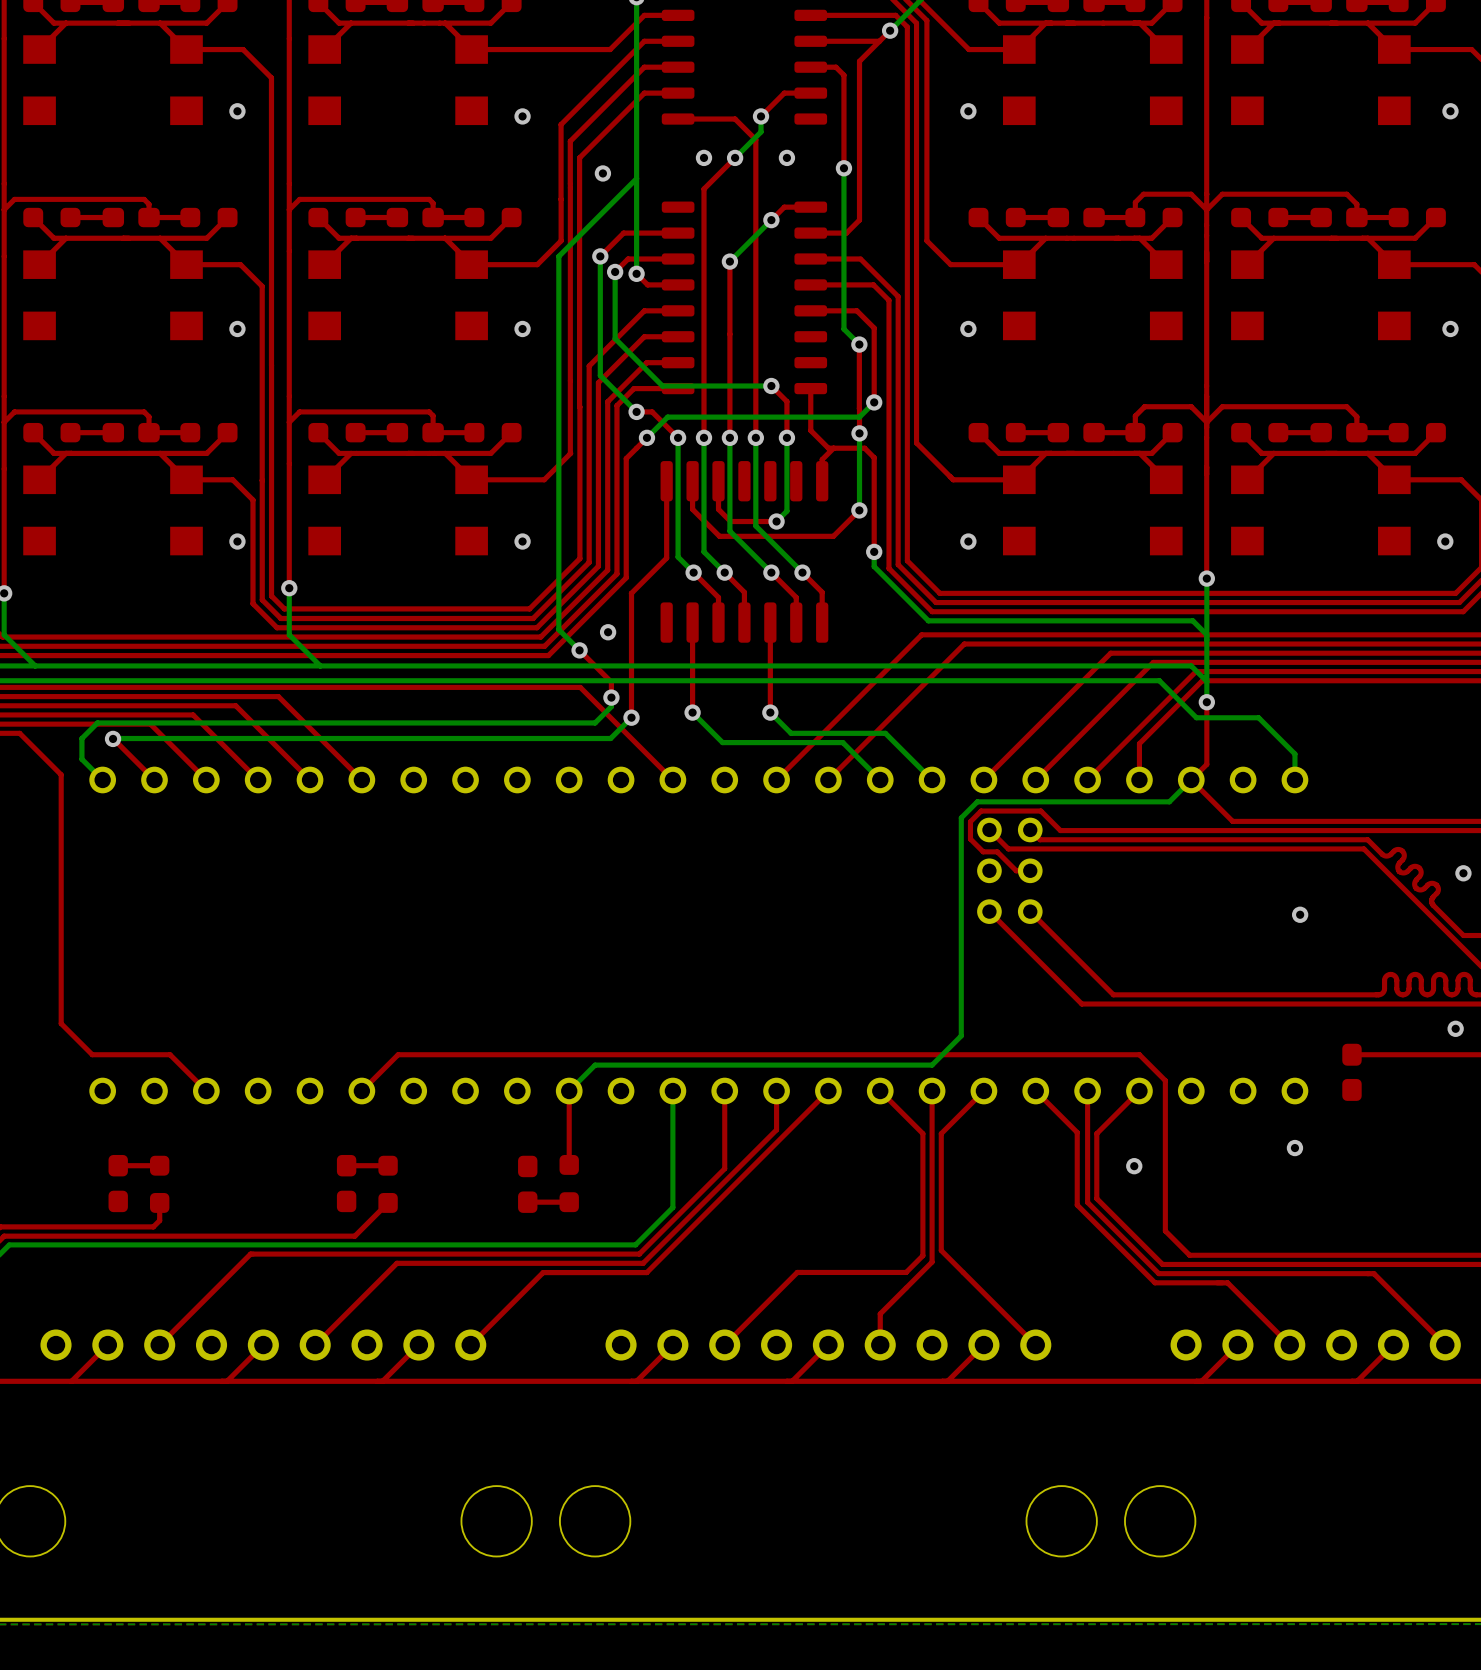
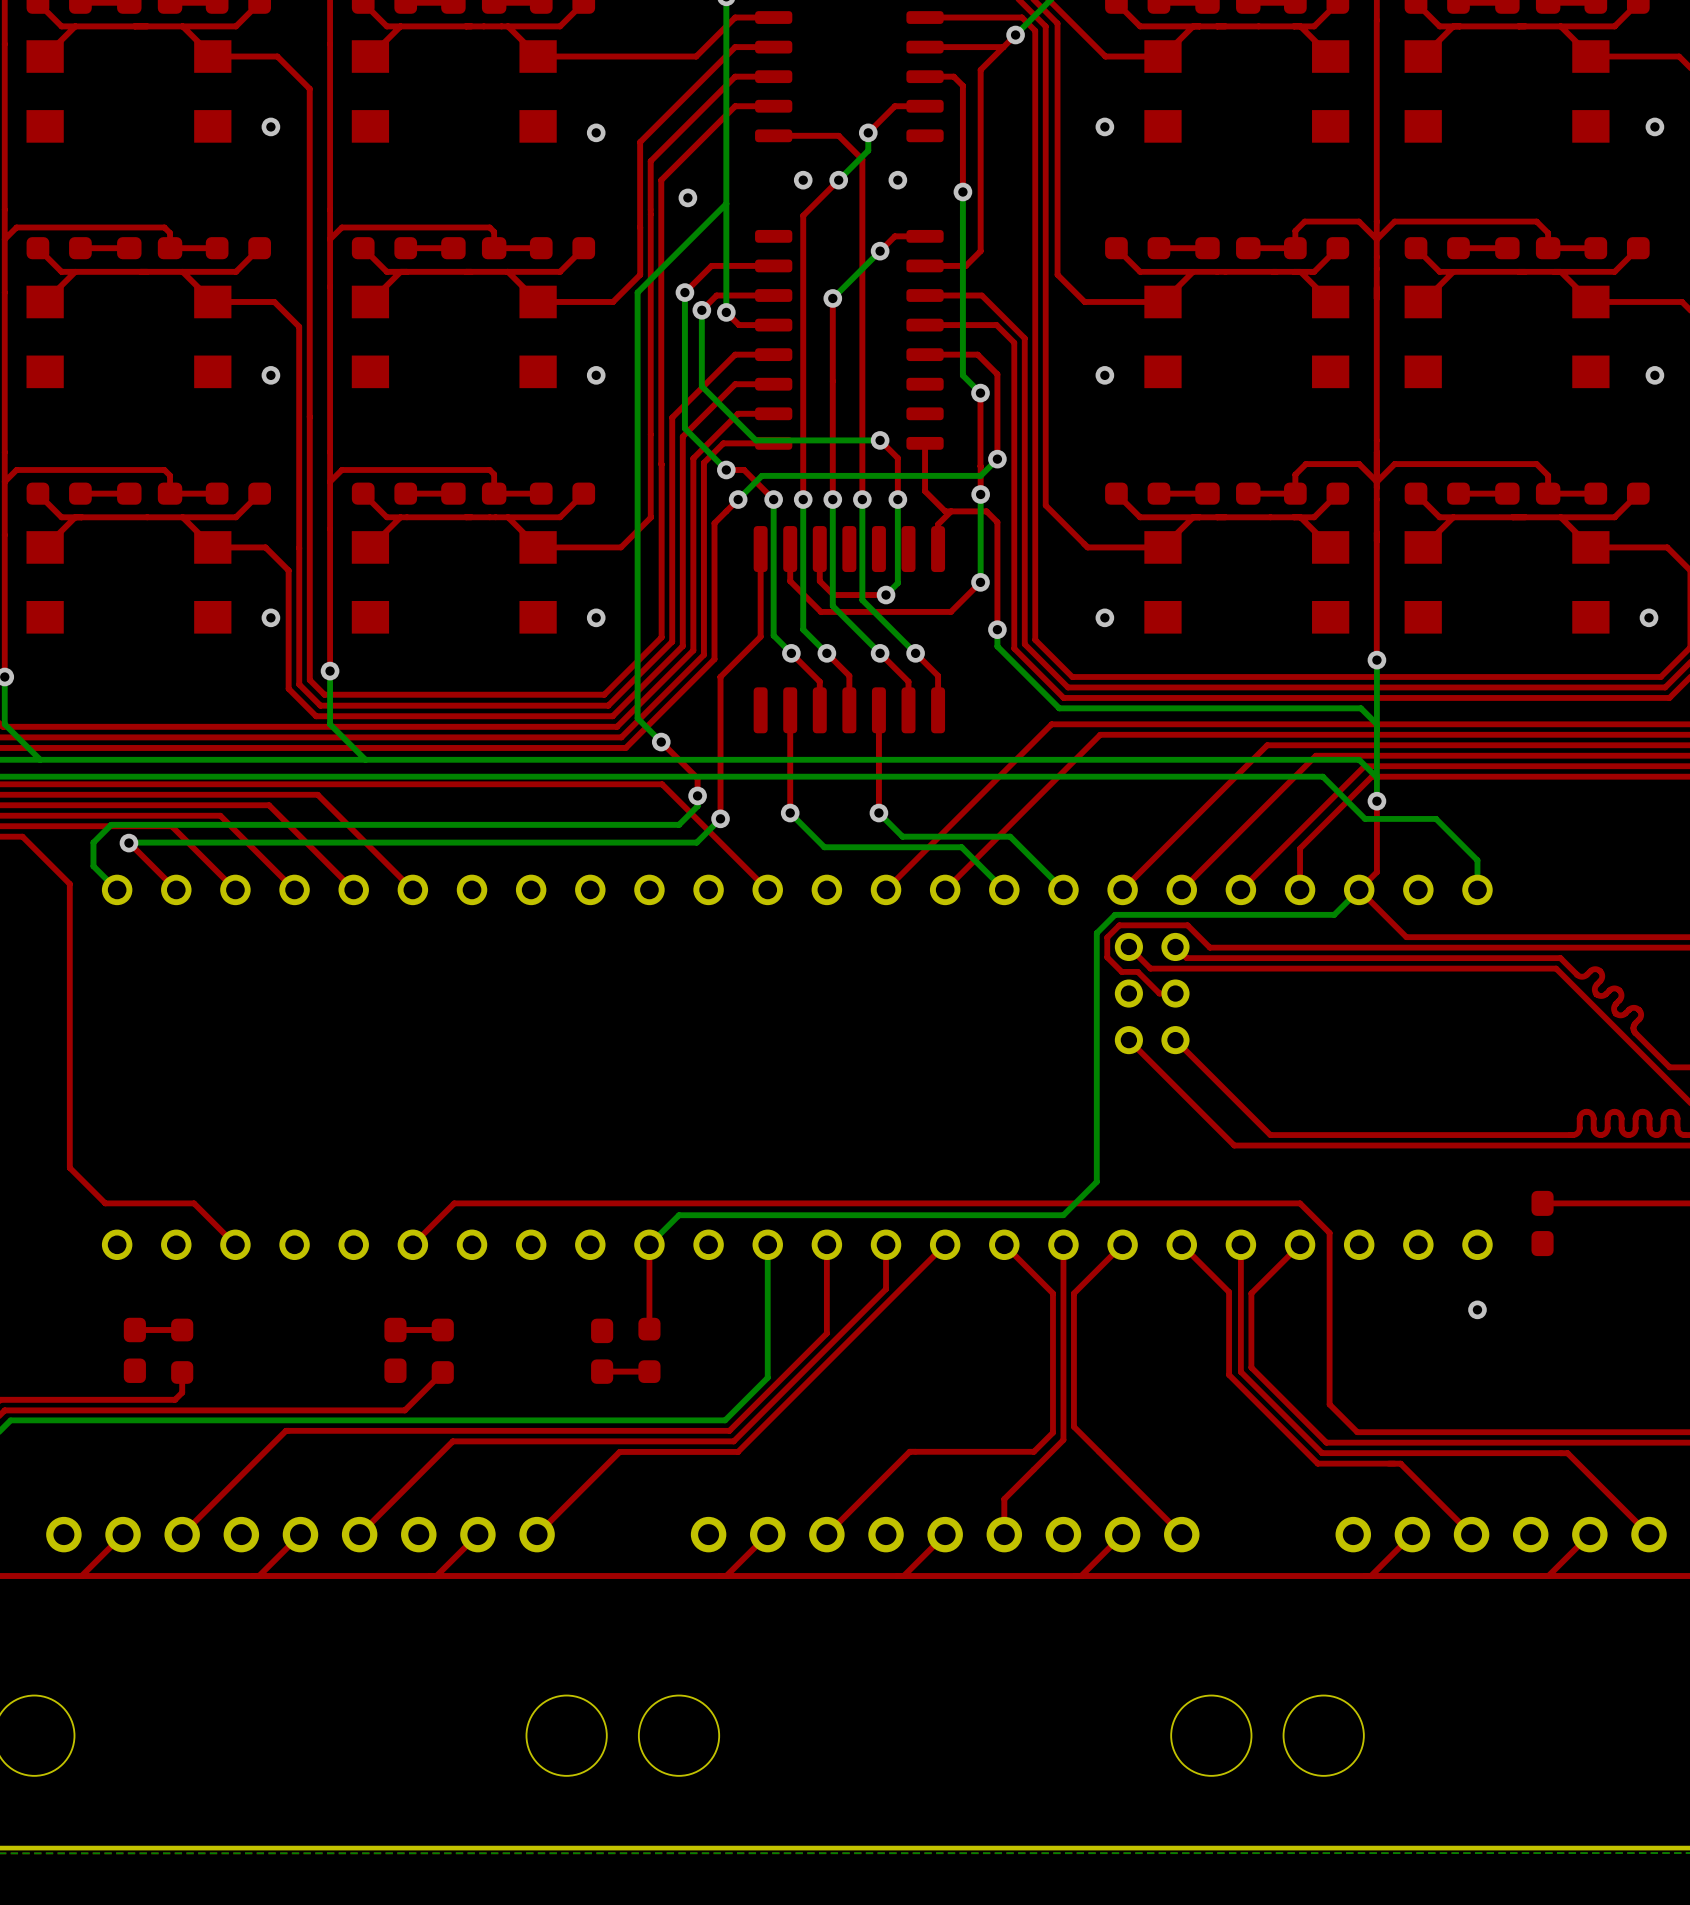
via: (608, 632) -> none
via: (1463, 873) -> none
via: (1300, 914) -> none
via: (1455, 1028) -> none
via: (1134, 1166) -> none

